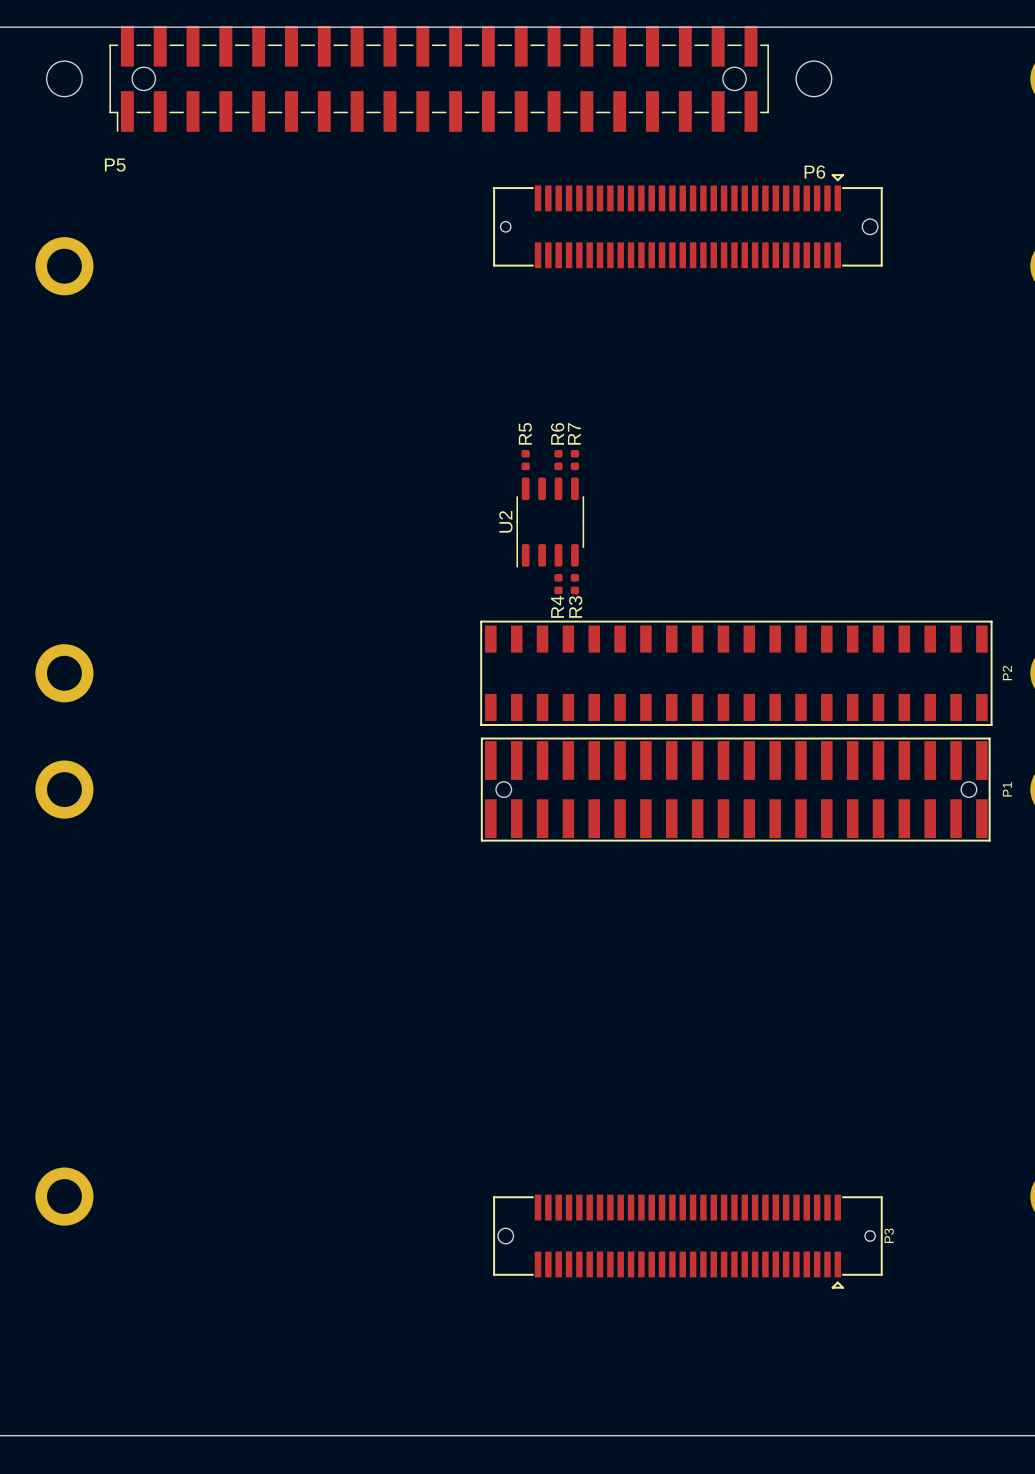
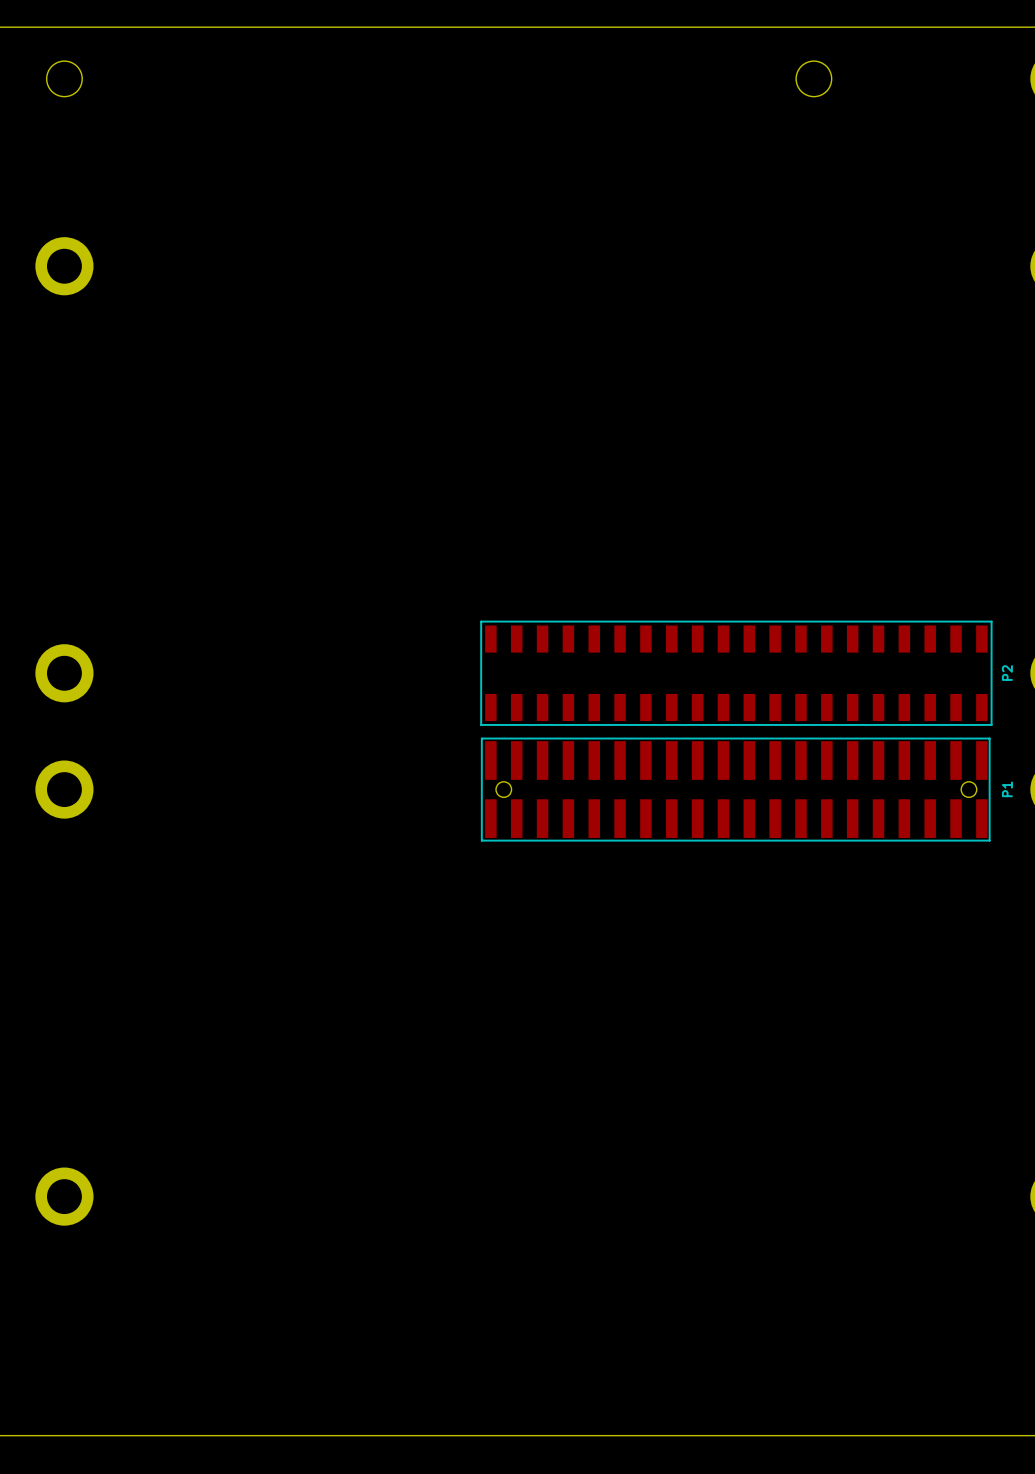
P5: (439, 78) -> none
P6: (687, 221) -> none
R5: (525, 460) -> none
R6: (558, 460) -> none
R7: (574, 460) -> none
U2: (550, 522) -> none
R4: (558, 584) -> none
R3: (574, 584) -> none
P3: (687, 1241) -> none

